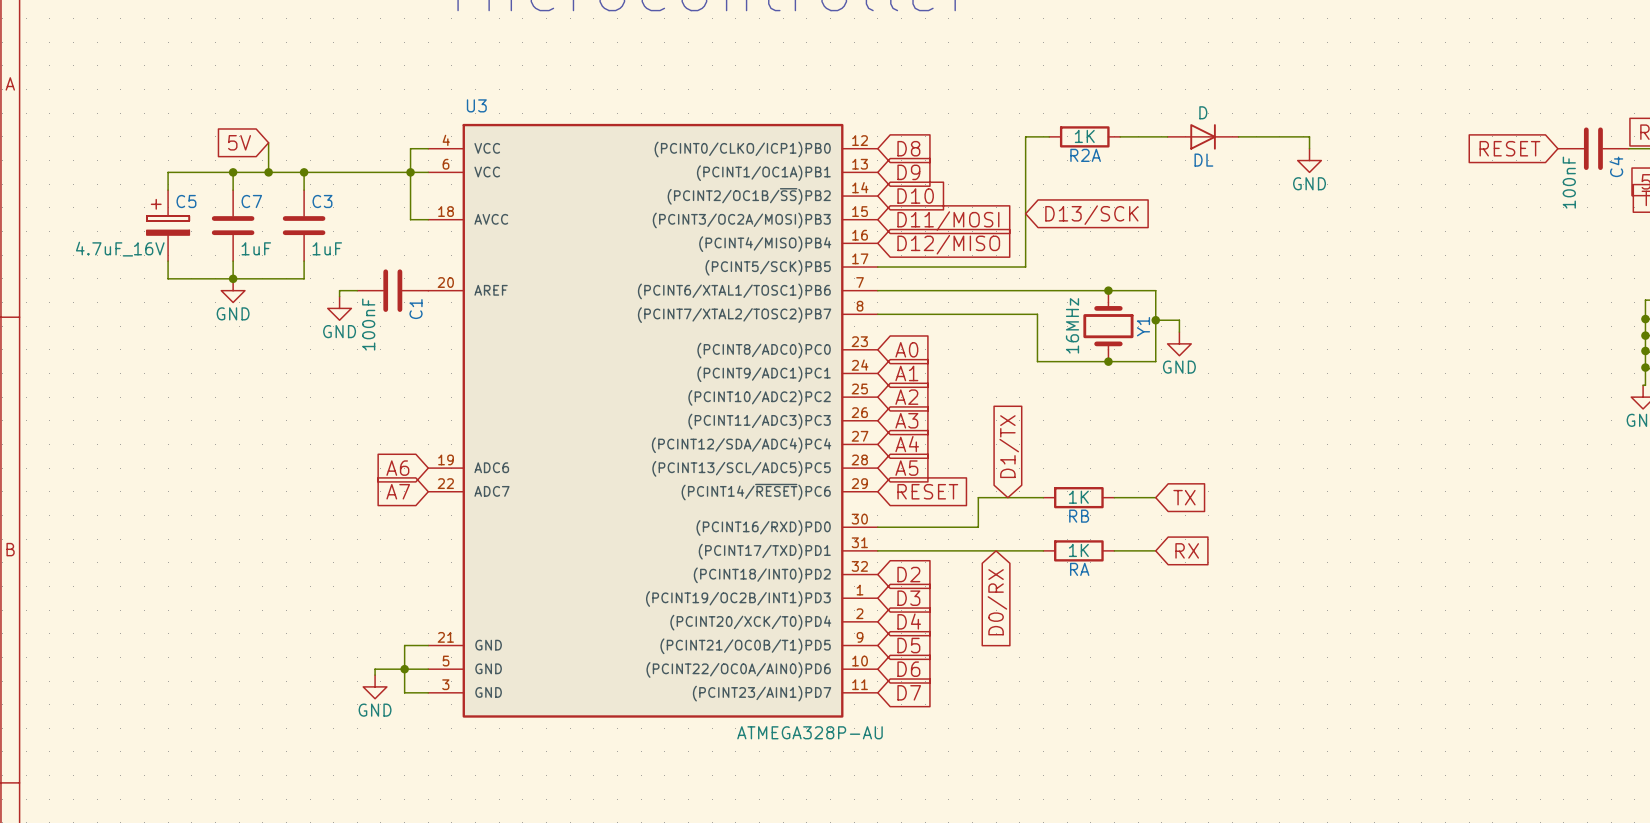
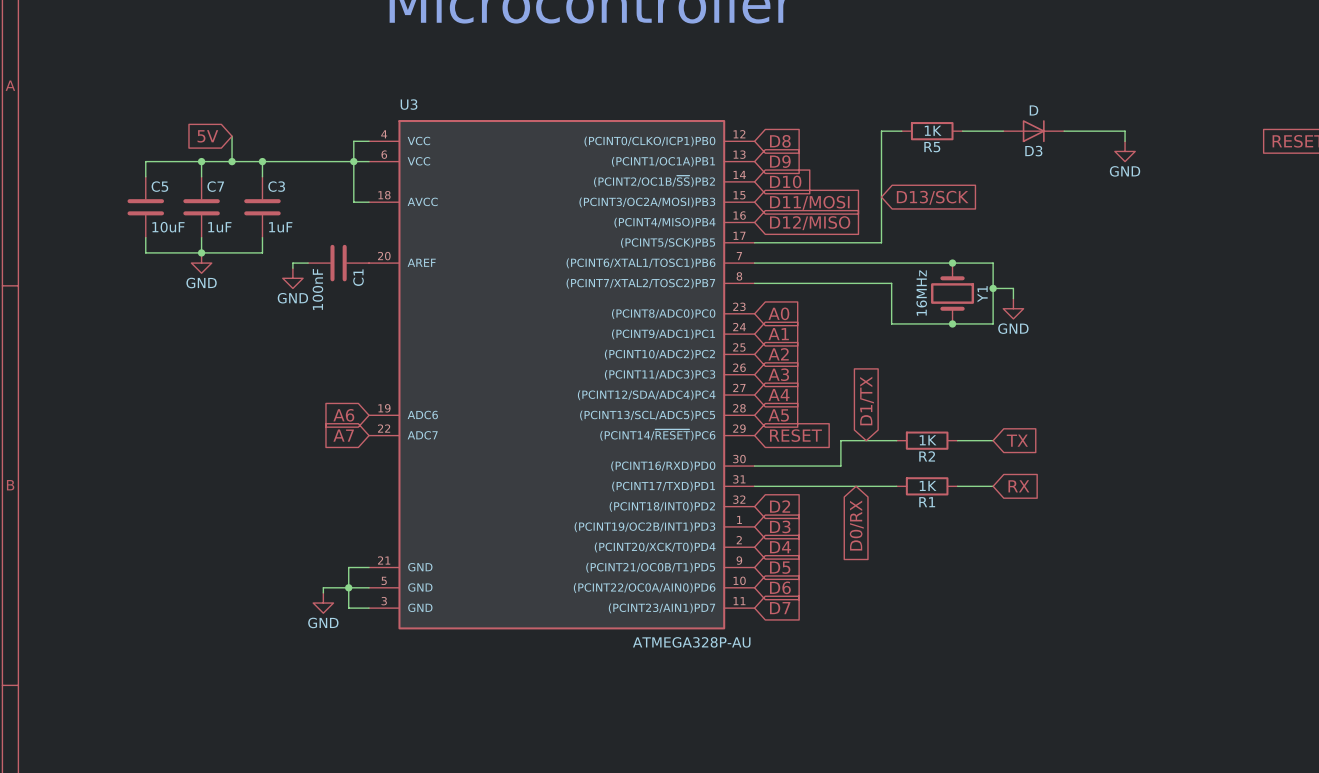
R2A name: R2A (1085, 155) -> R5 (932, 147)
DL name: DL (1203, 160) -> D3 (1033, 151)
C5 symbol: [146, 190, 190, 262] -> [127, 176, 165, 238]
C5 value: 4.7uF_16V (120, 249) -> 10uF (168, 227)
RB name: RB (1079, 516) -> R2 (927, 456)
RA name: RA (1079, 569) -> R1 (927, 502)

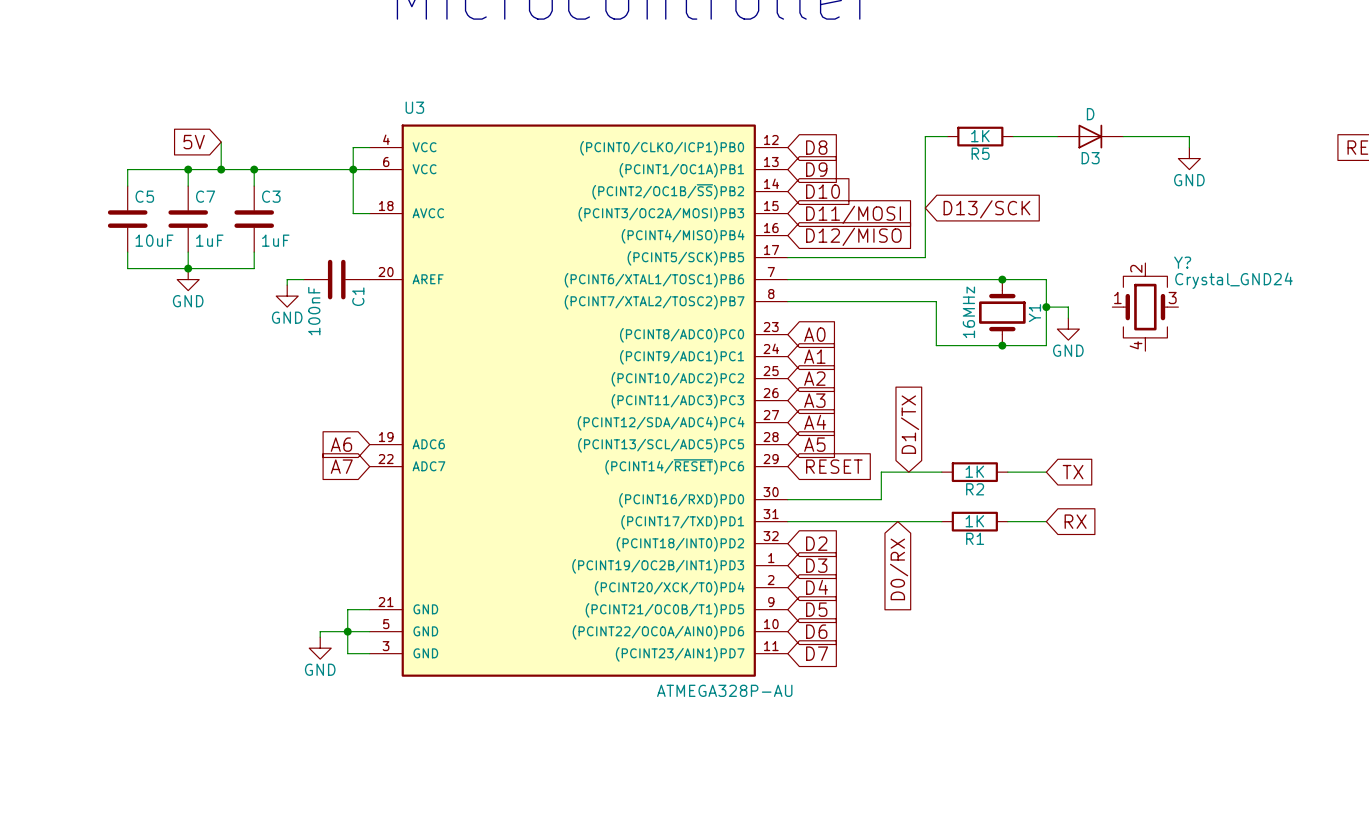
Y?: none -> Crystal_GND24 (1145, 307)

